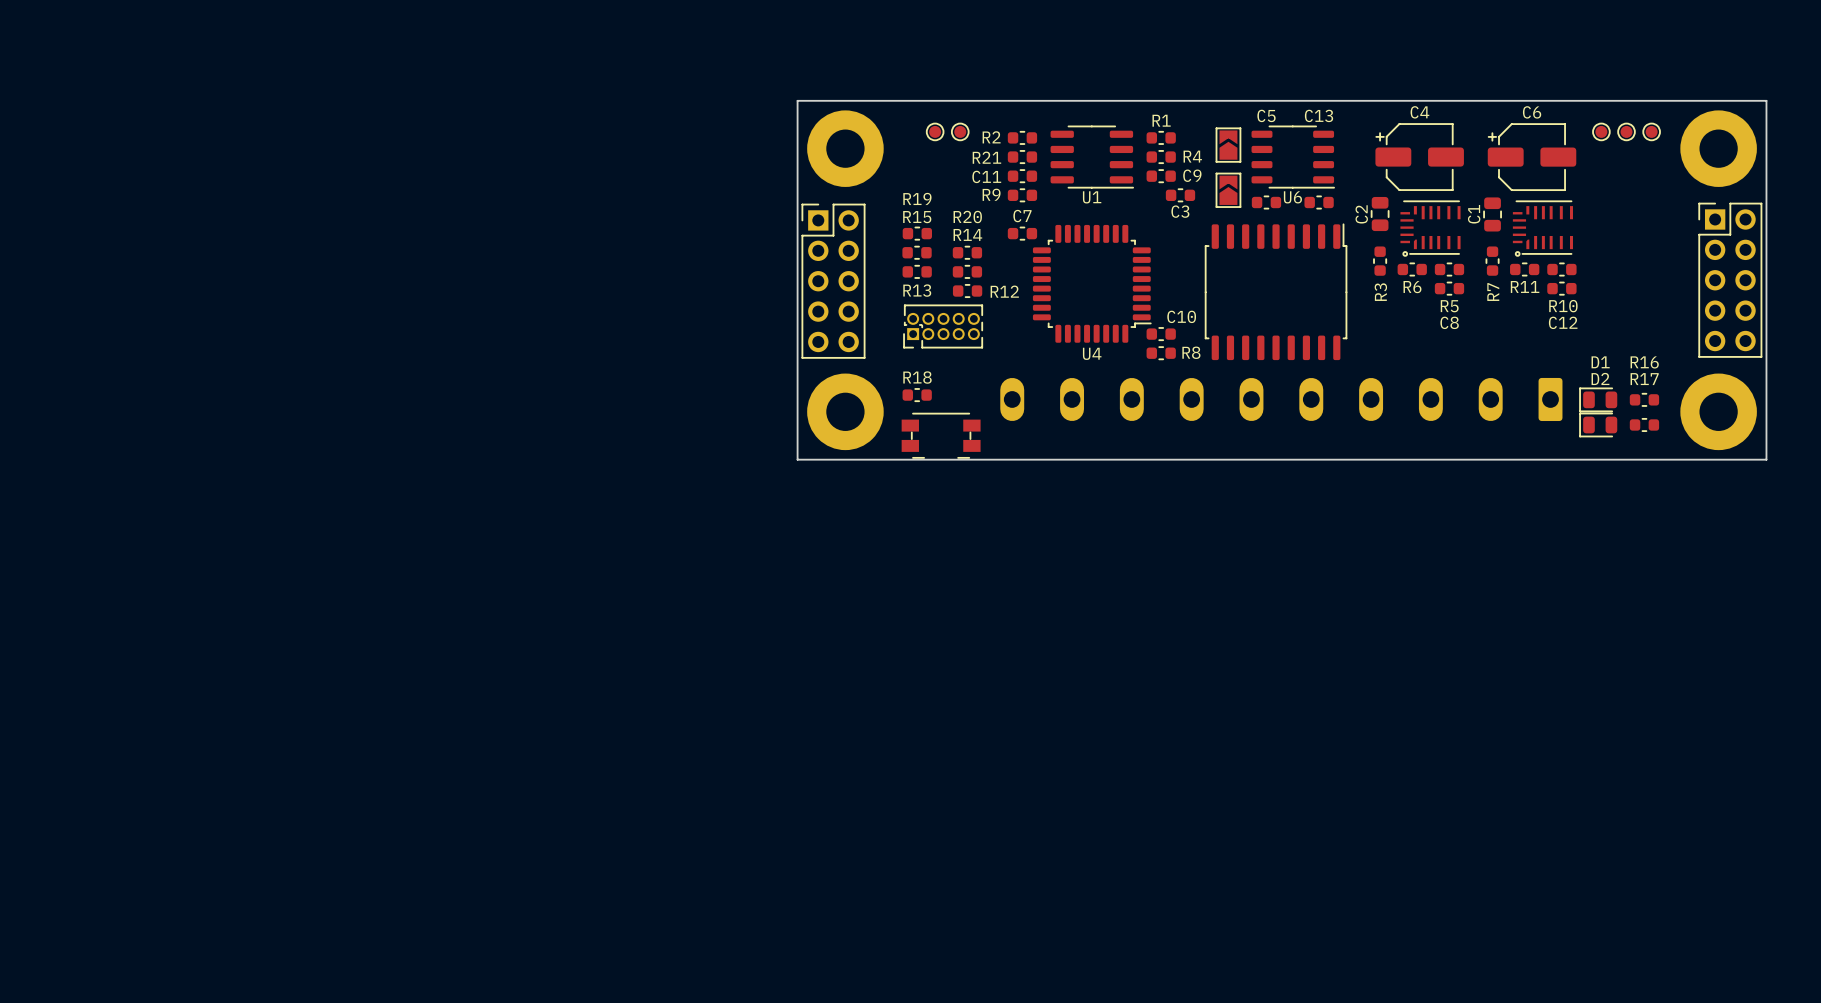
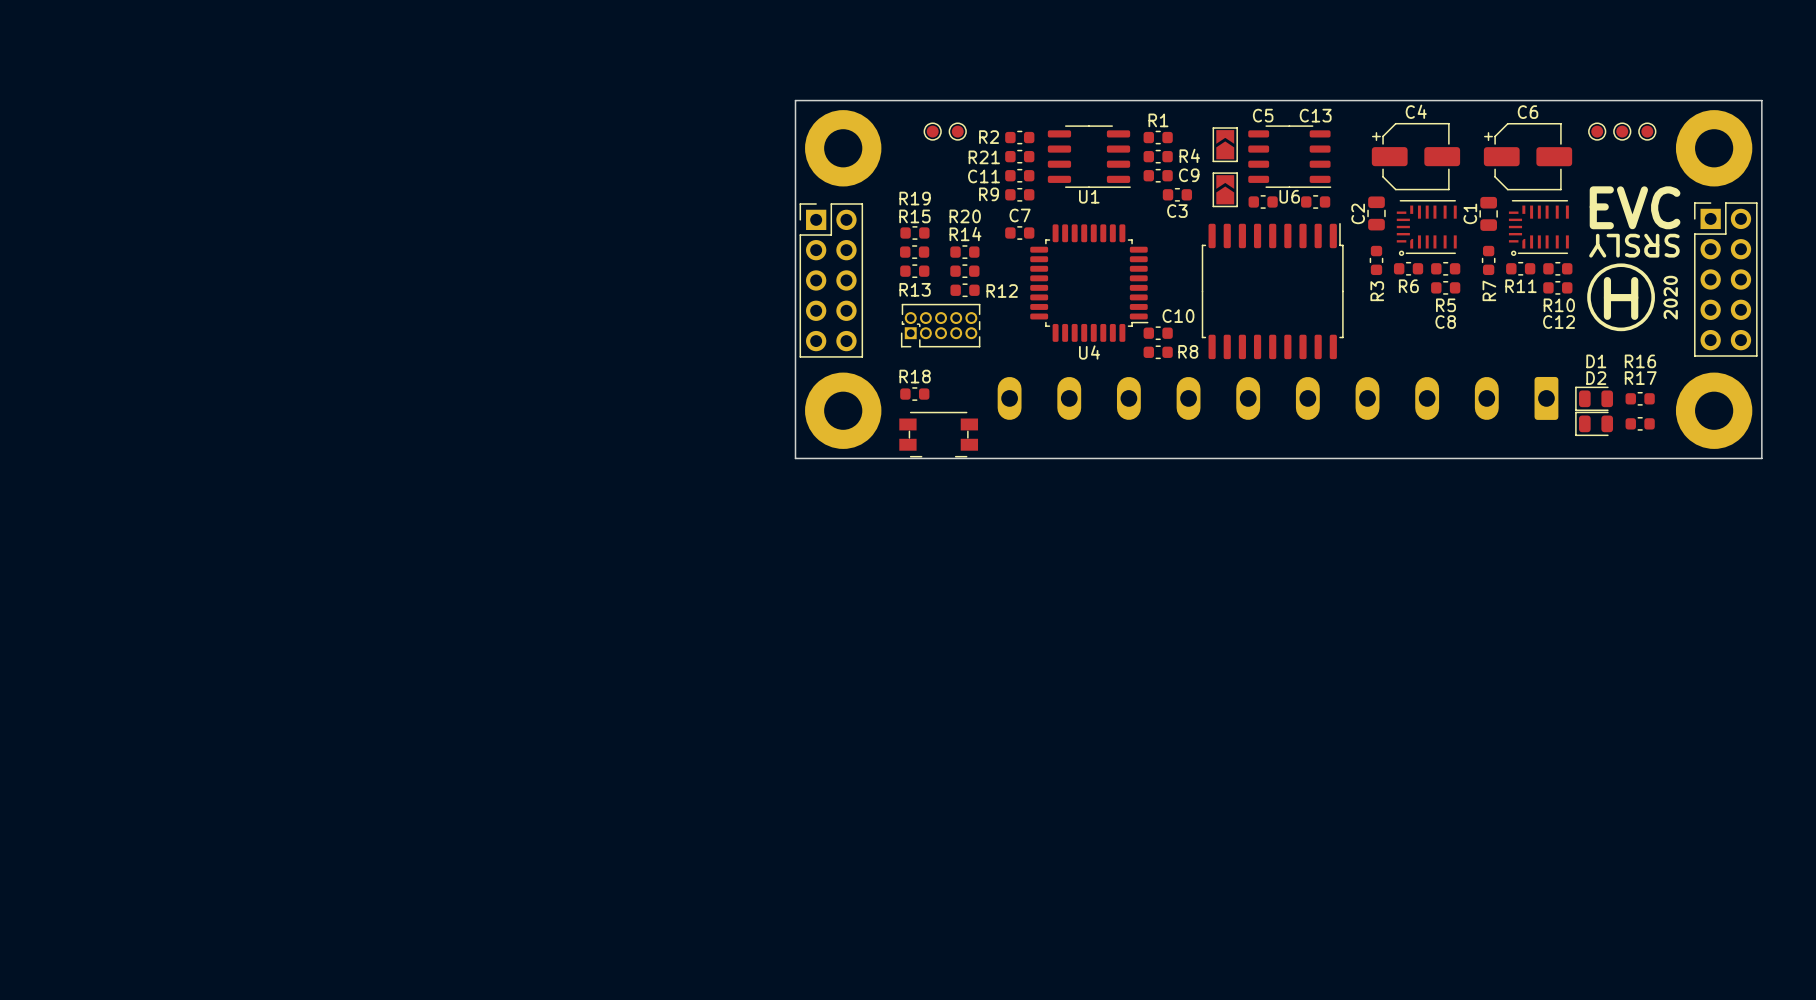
text: none -> EVC (1635, 207)
text: none -> SRSLY (1634, 245)
drawing: none -> [1587, 263, 1655, 332]
text: none -> 2020 (1670, 297)
text: none -> H (1621, 298)

